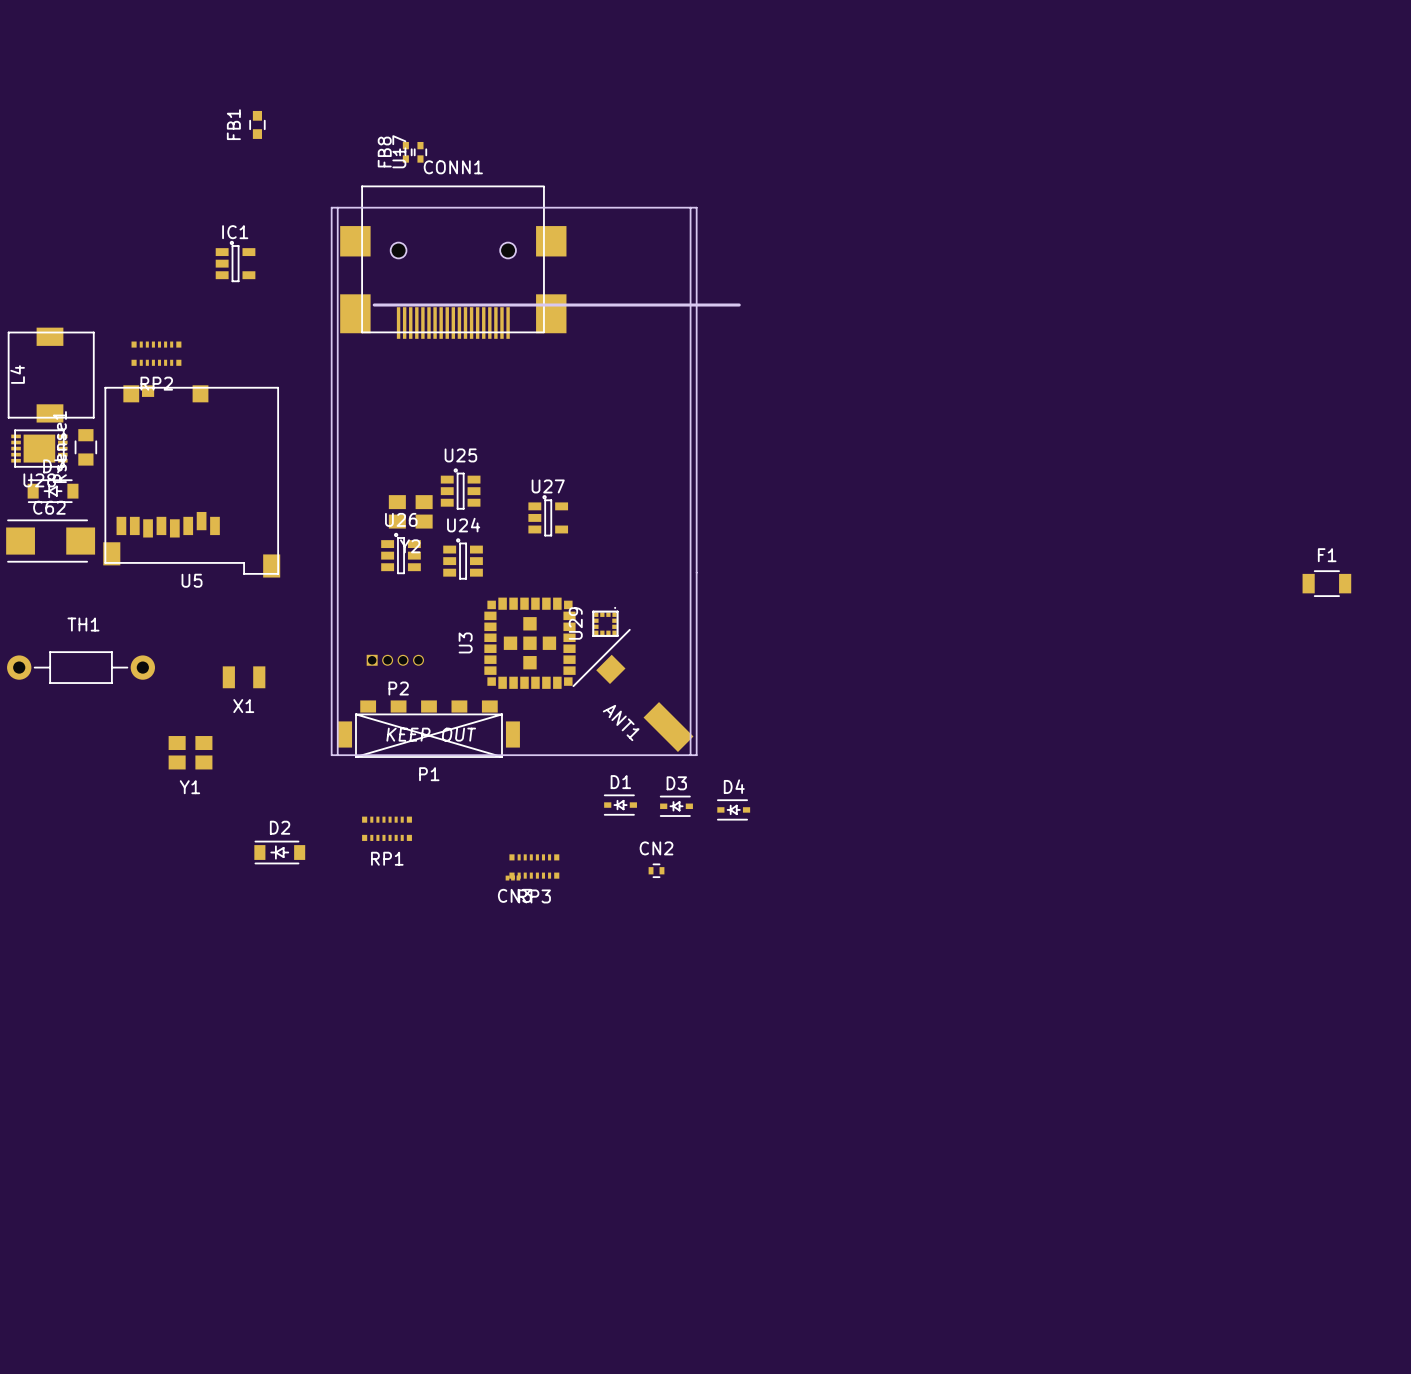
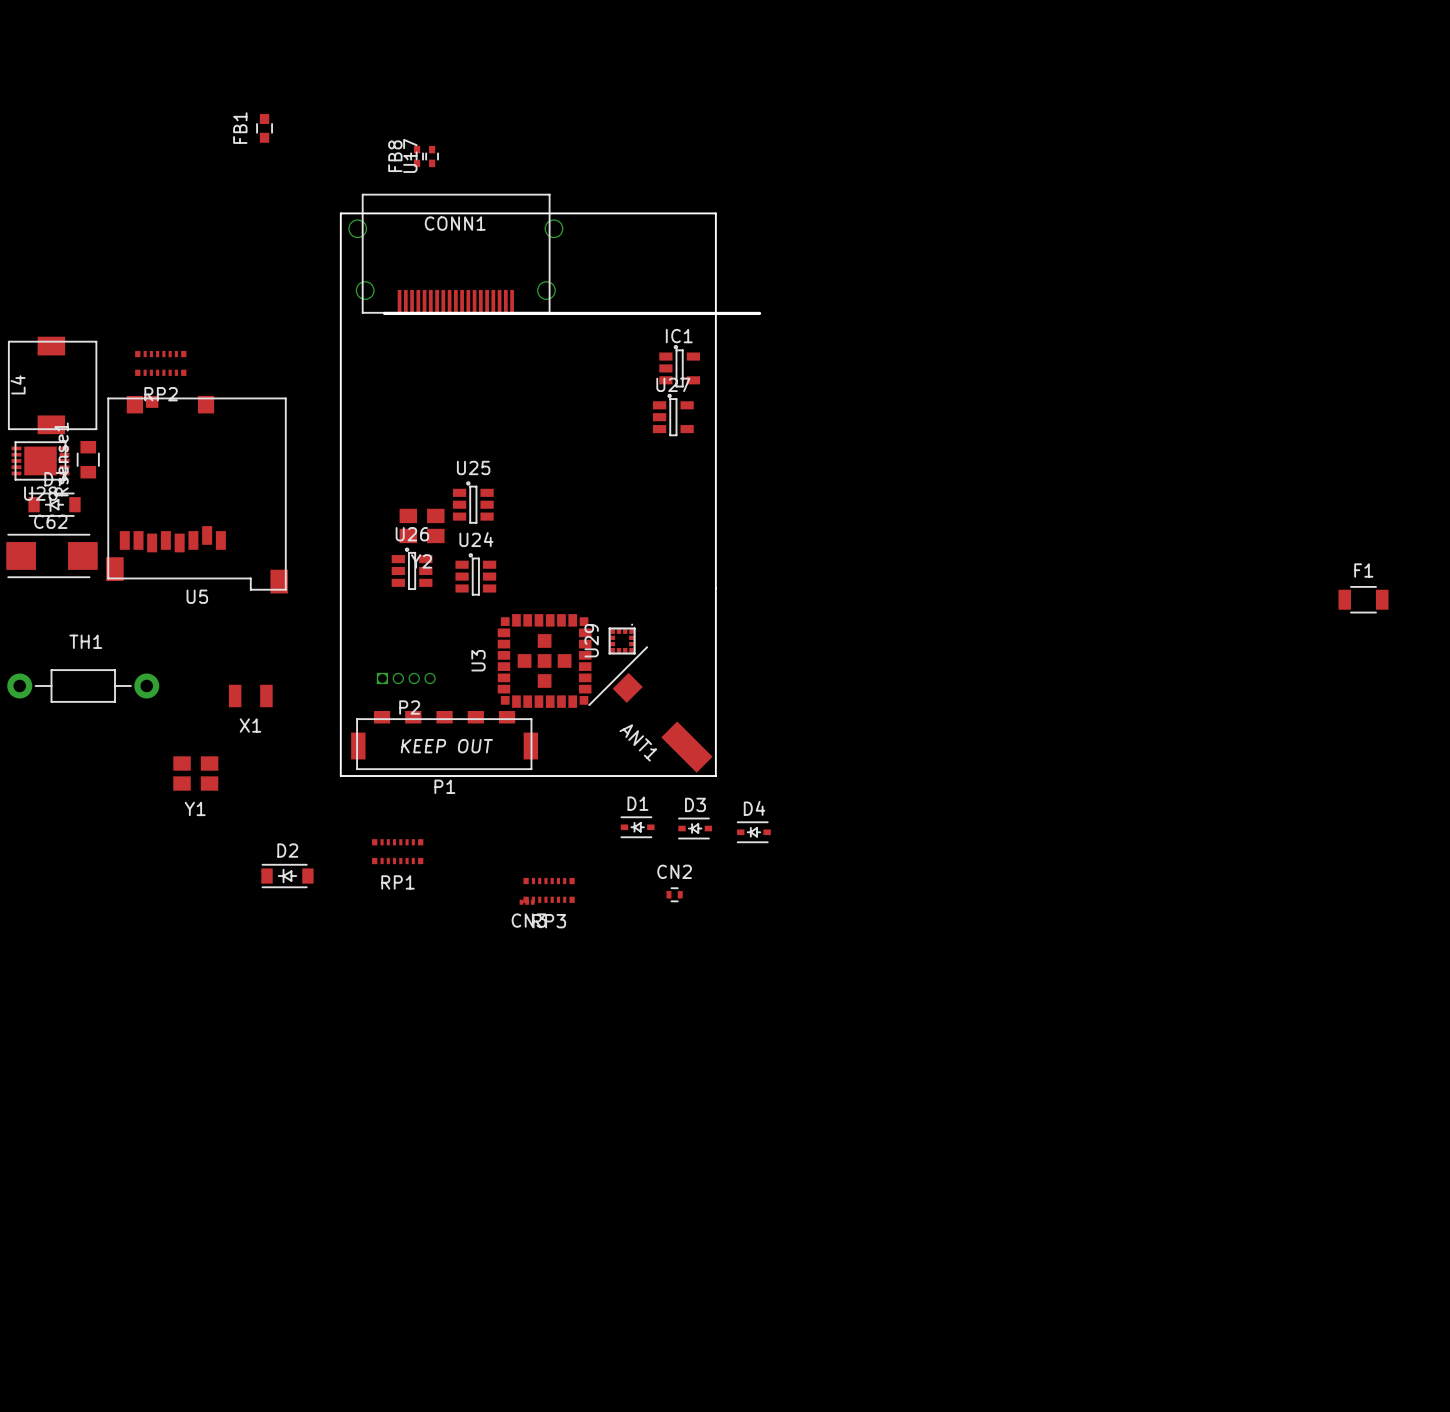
CONN1 name position: CONN1 (453, 167) -> CONN1 (455, 223)
CONN1 footprint: [340, 185, 567, 339] -> [348, 193, 564, 314]
board edge: (337, 207) (337, 755) -> none
board edge: (690, 207) (690, 755) -> none
IC1 position: (235, 261) -> (679, 366)
U27 position: (548, 515) -> (673, 415)
P1 footprint: [338, 700, 520, 758] -> [351, 710, 539, 771]

